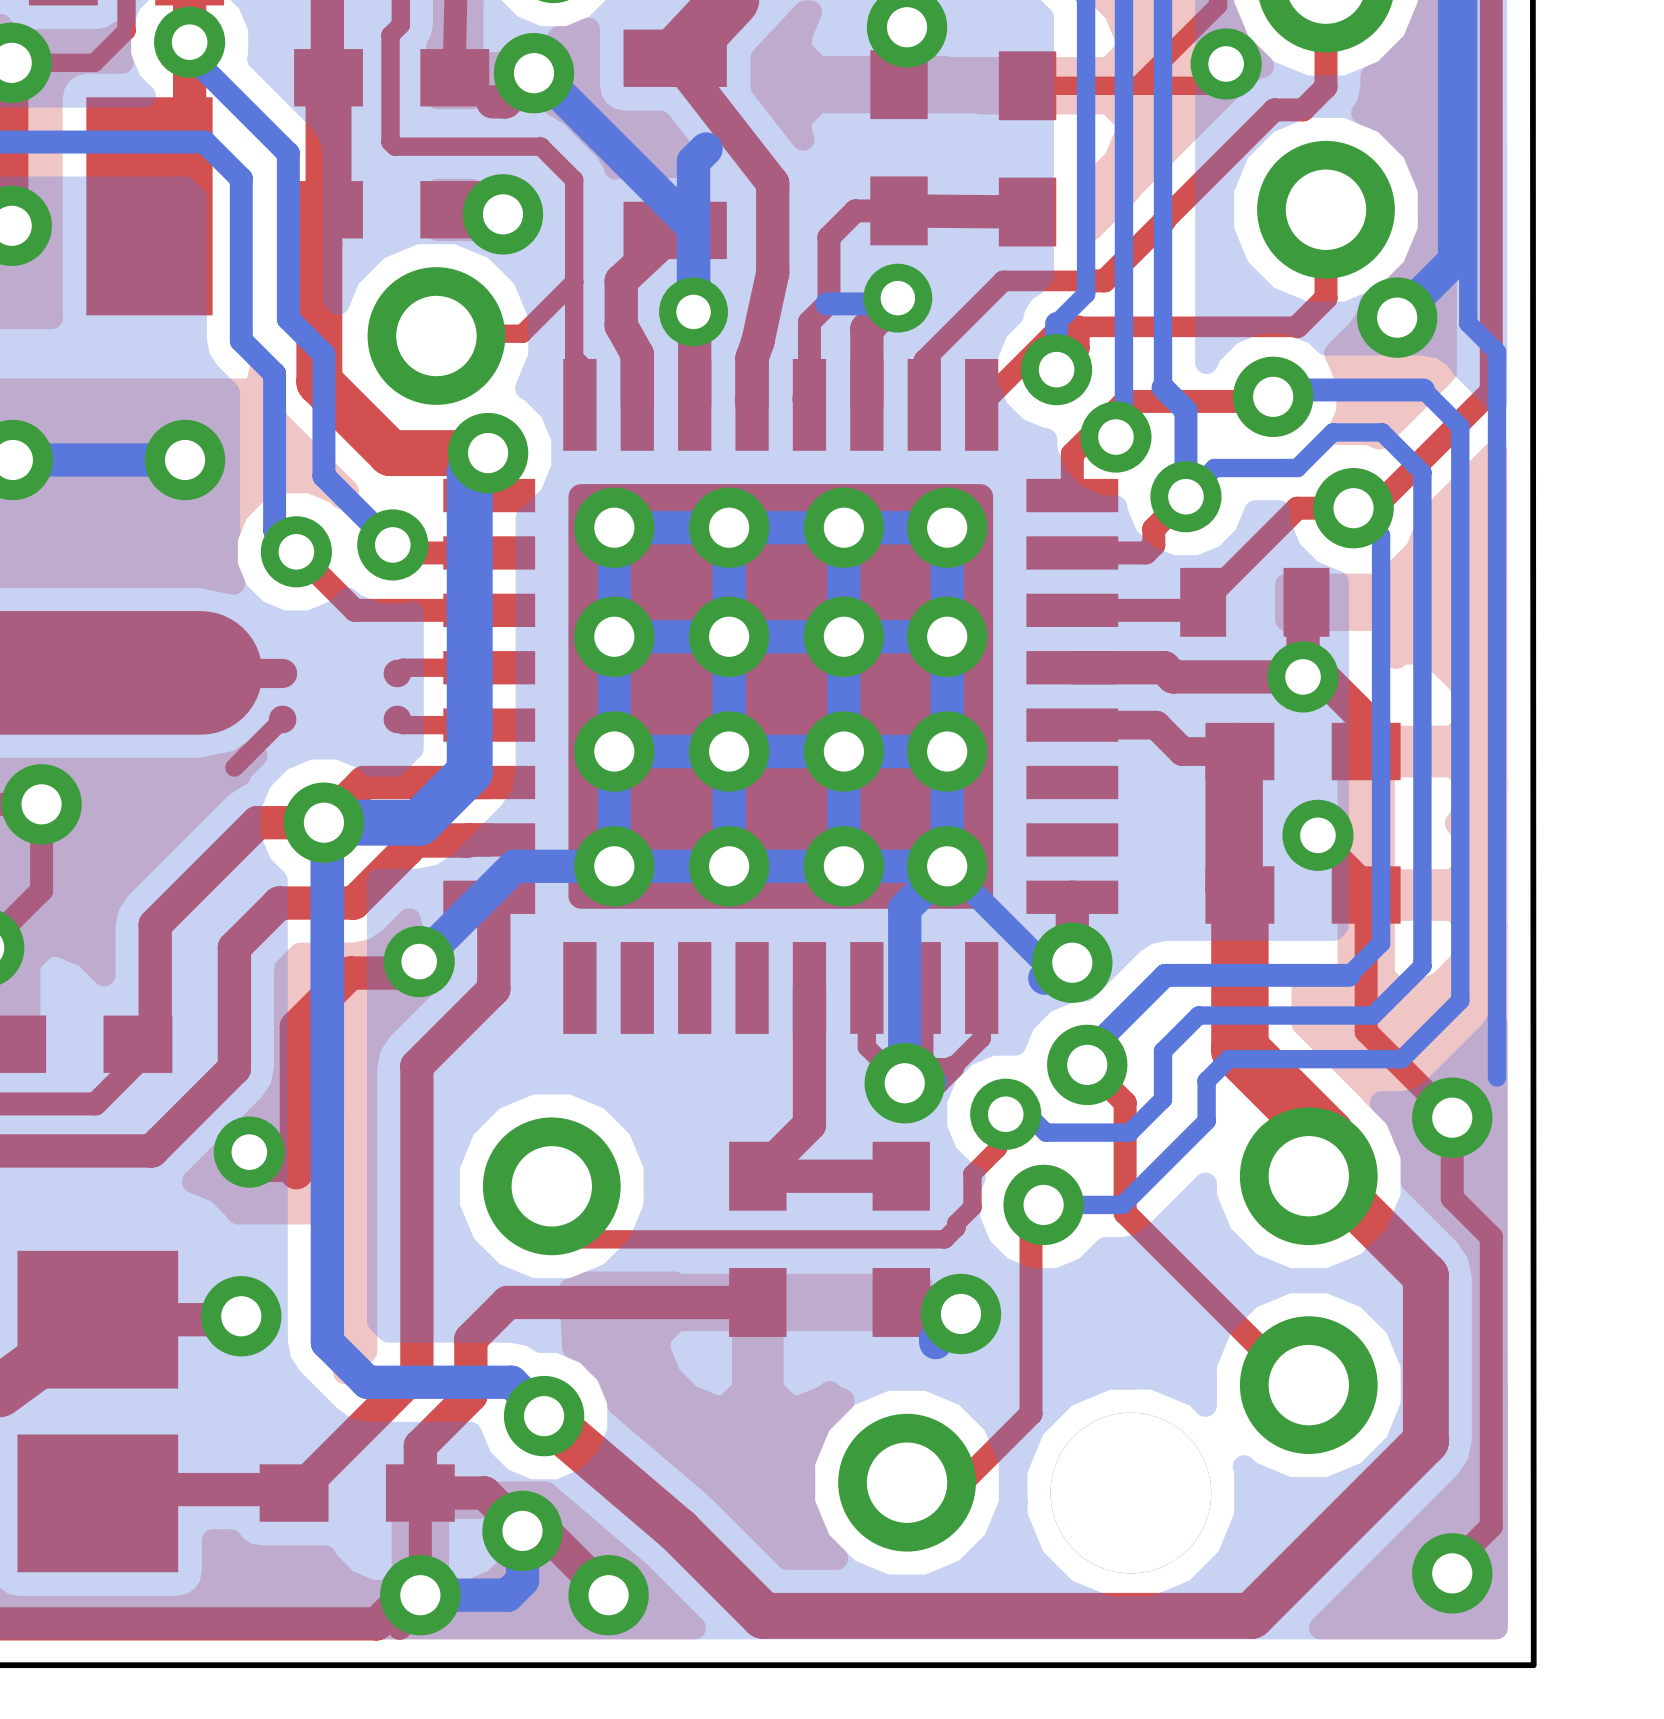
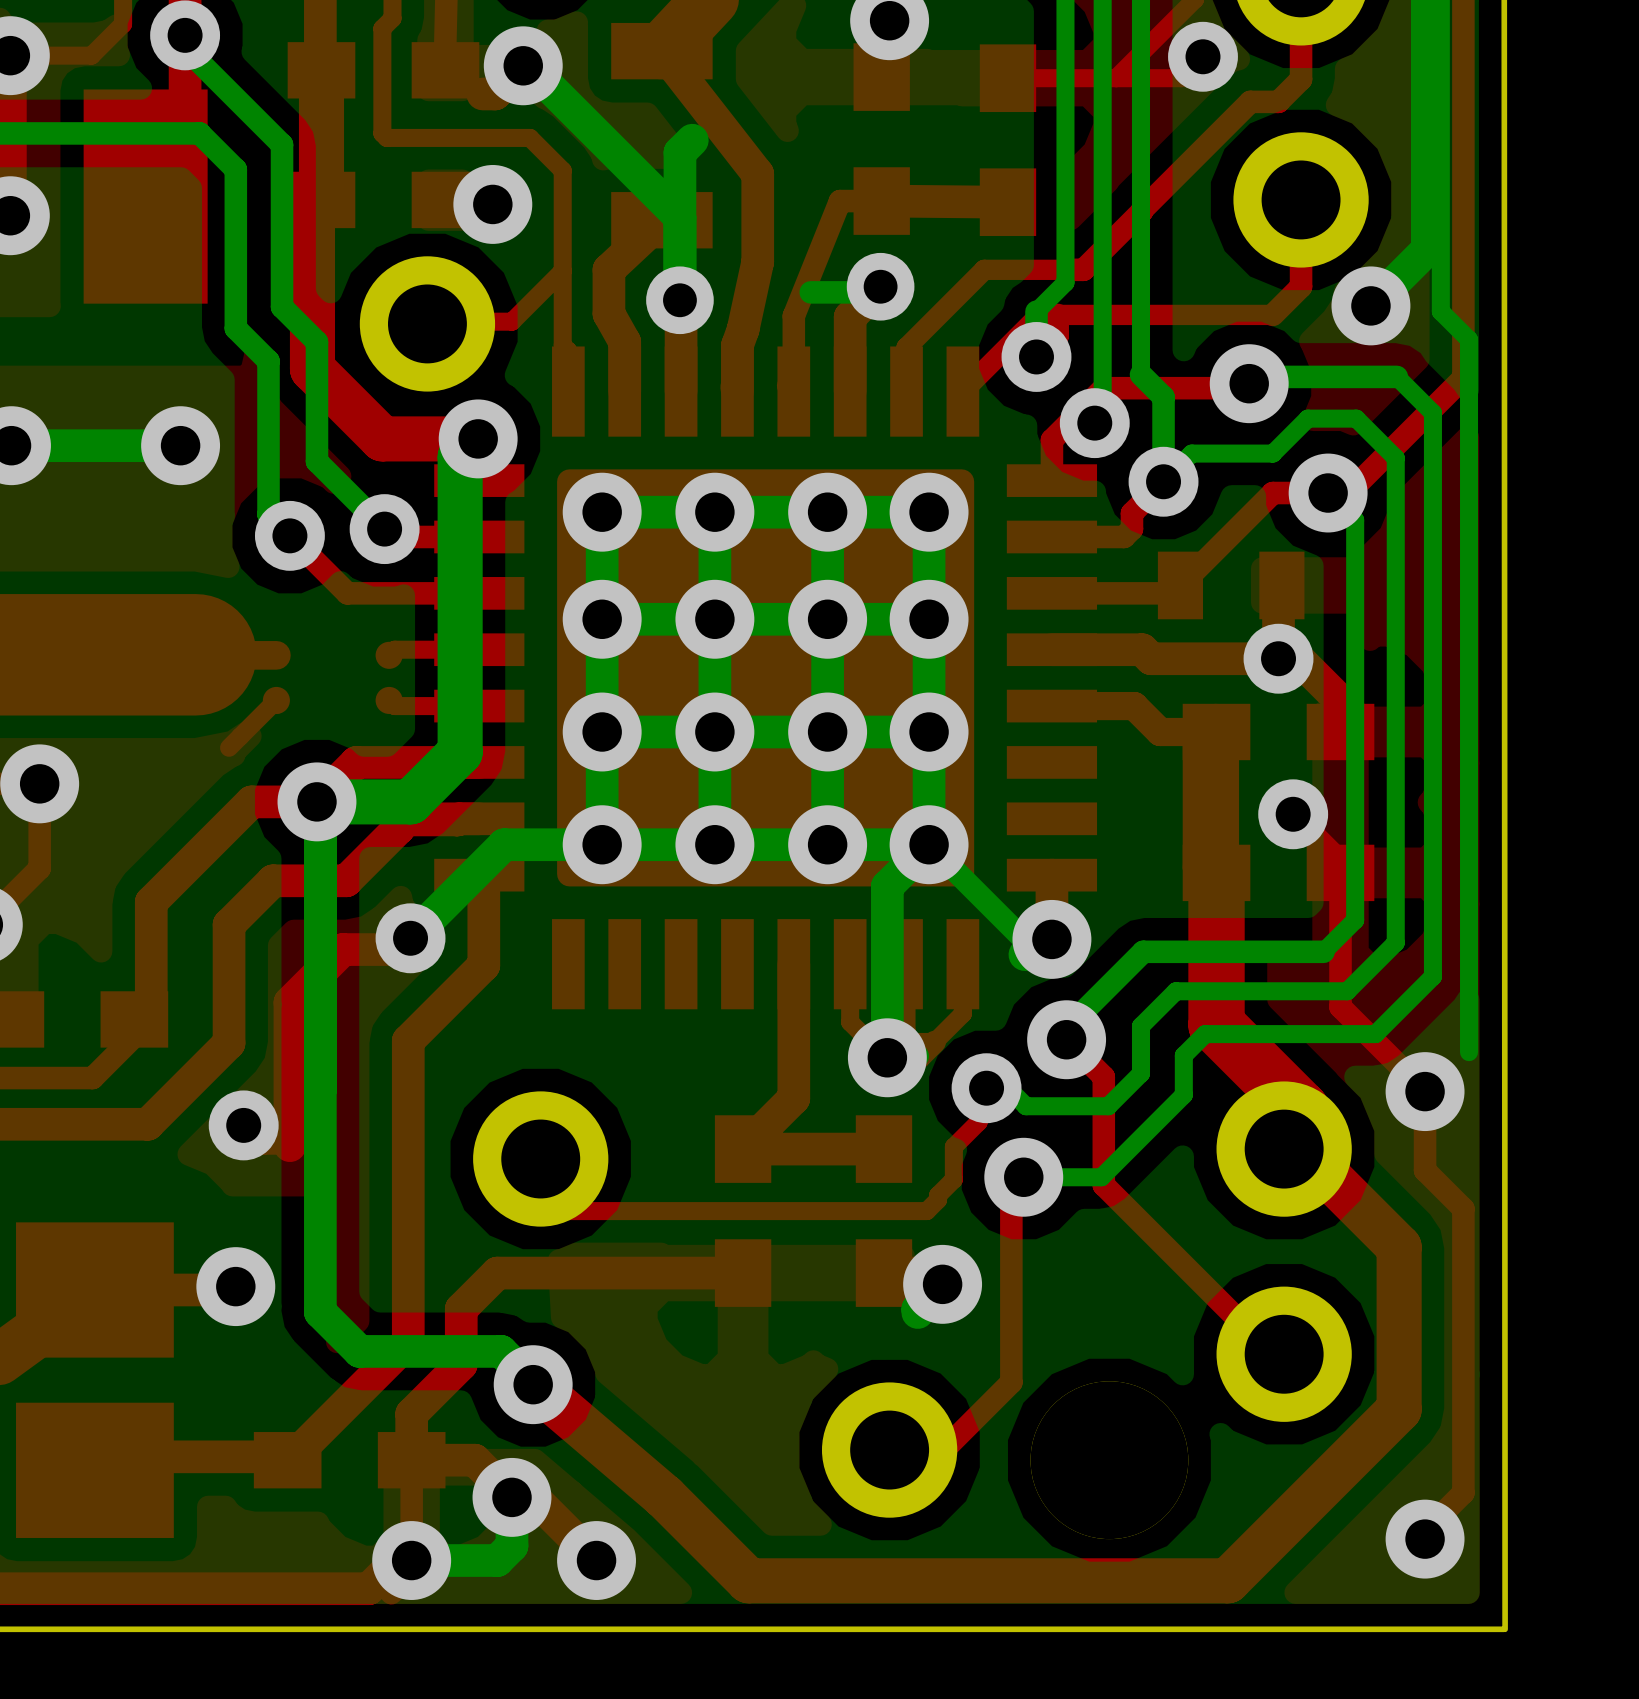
top track: (855, 210) (828, 237) (828, 302) (809, 322) (809, 327) -> (840, 201) (793, 316)

